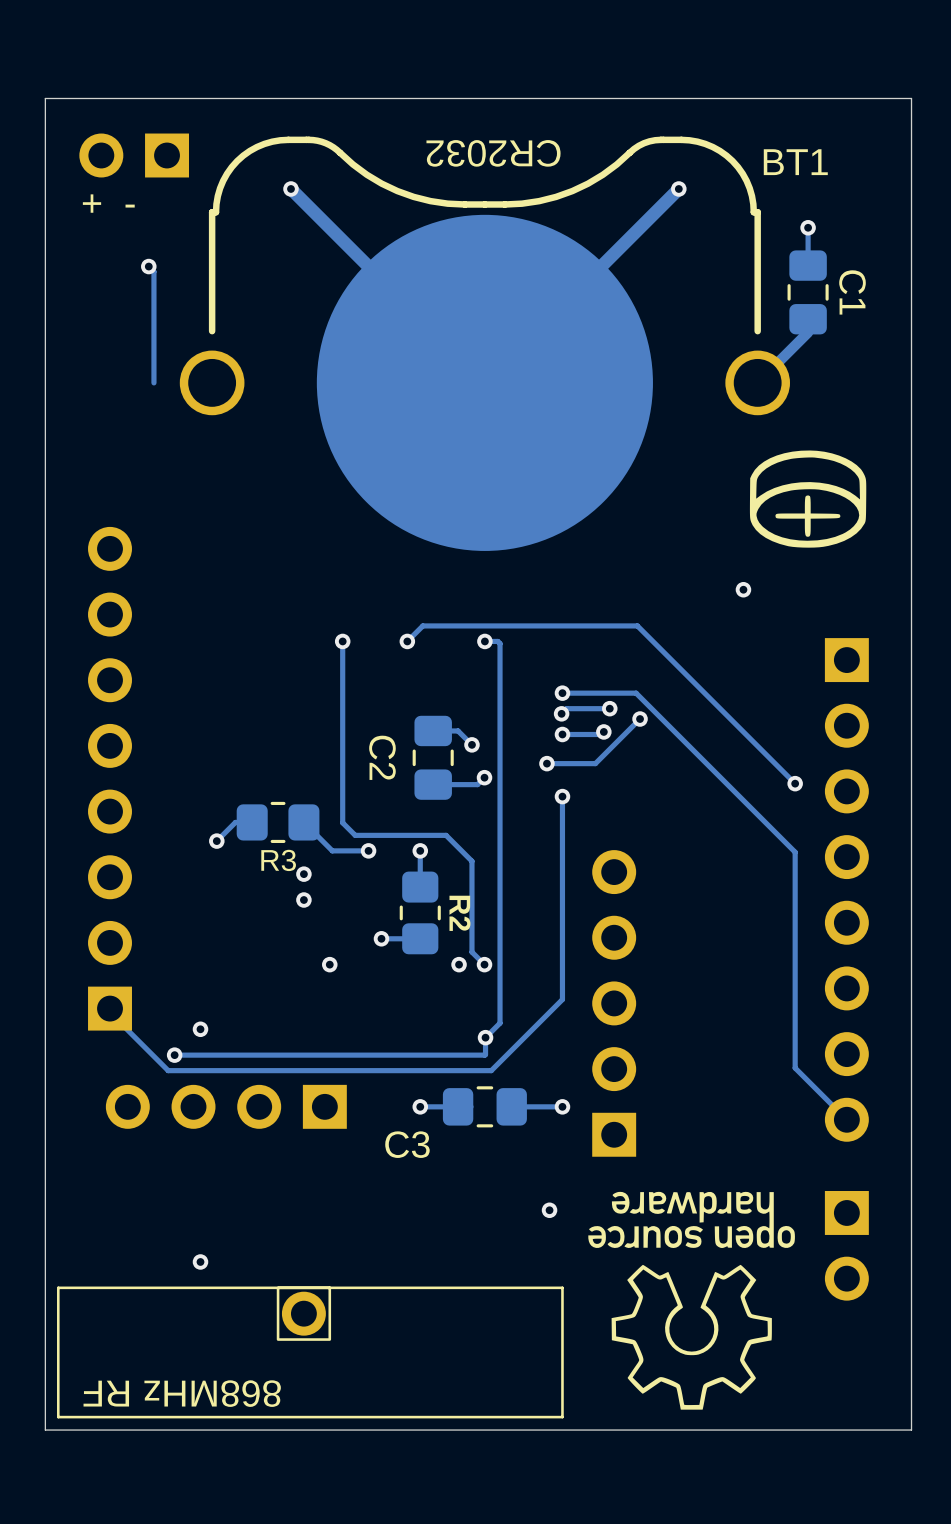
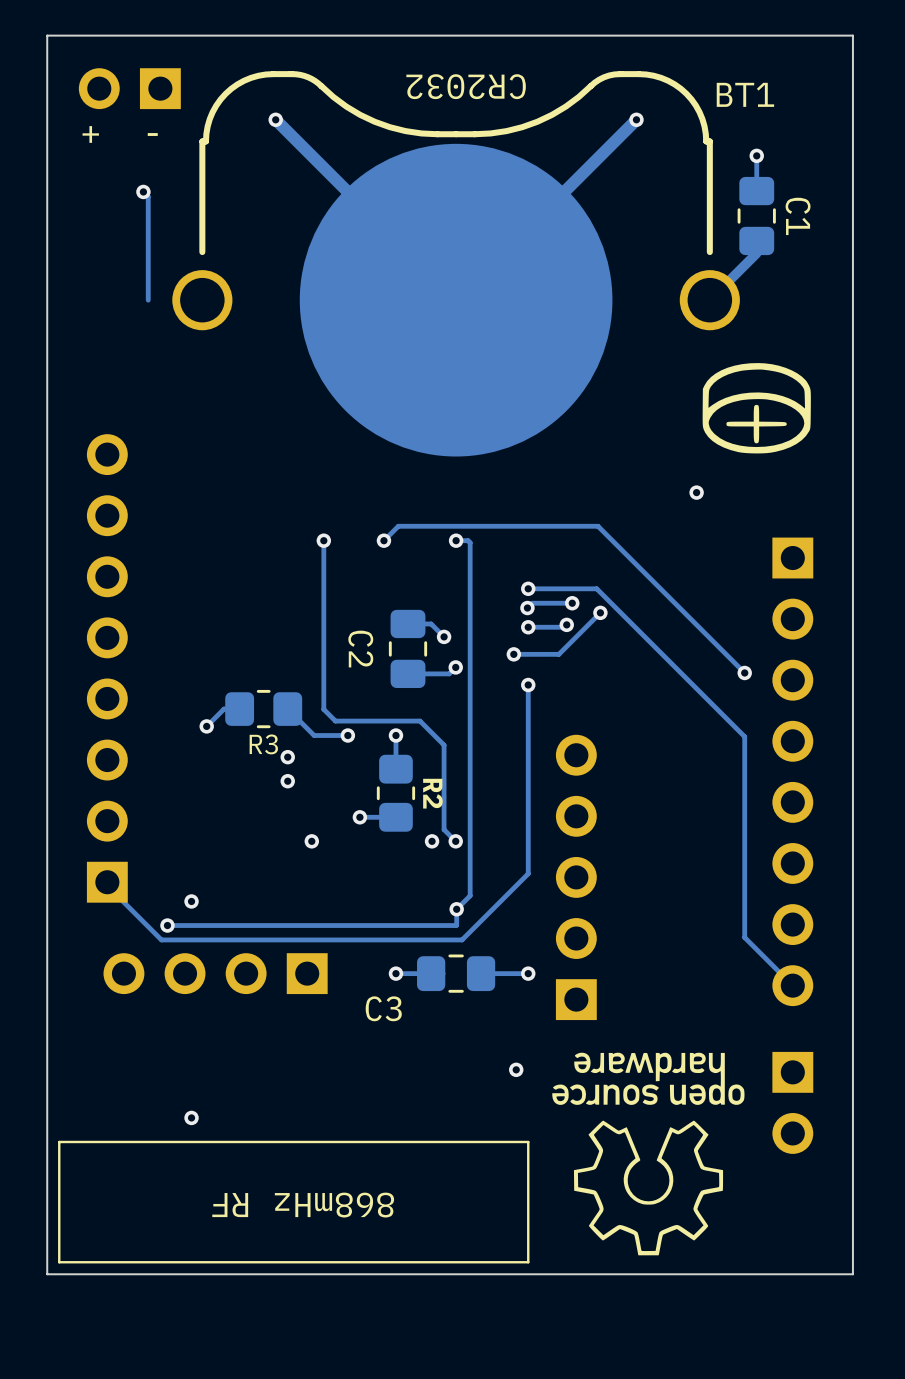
part: (303, 1313) -> none
text: 868MHz RF (182, 1393) -> 868mHz RF (303, 1205)

